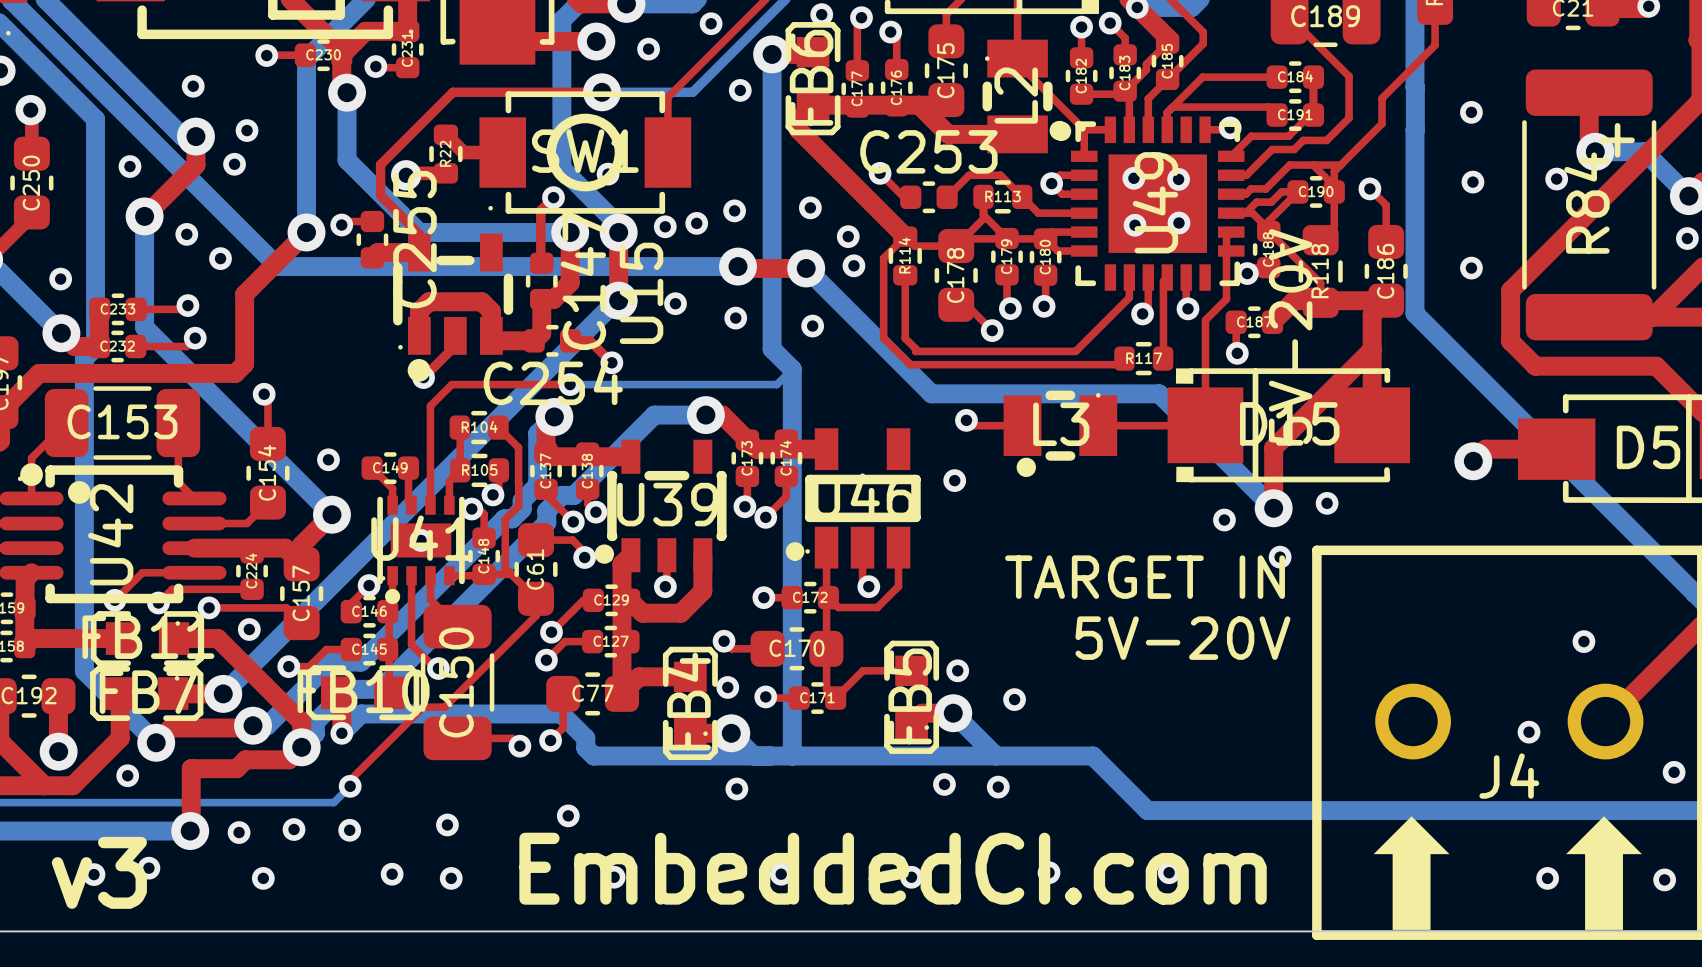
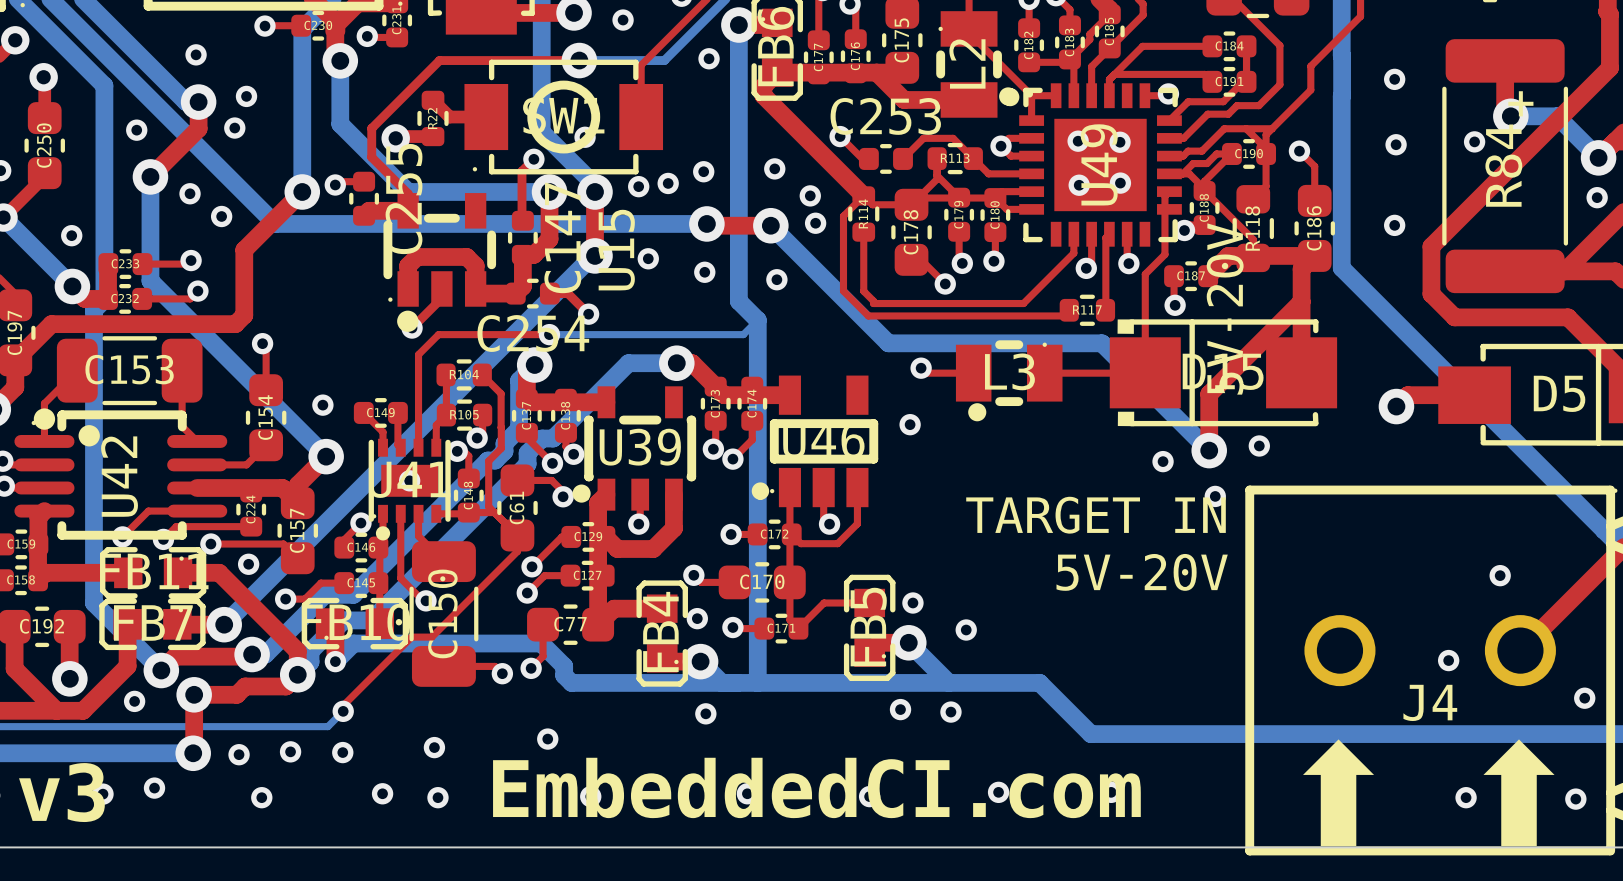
via: none -> (194, 694)

